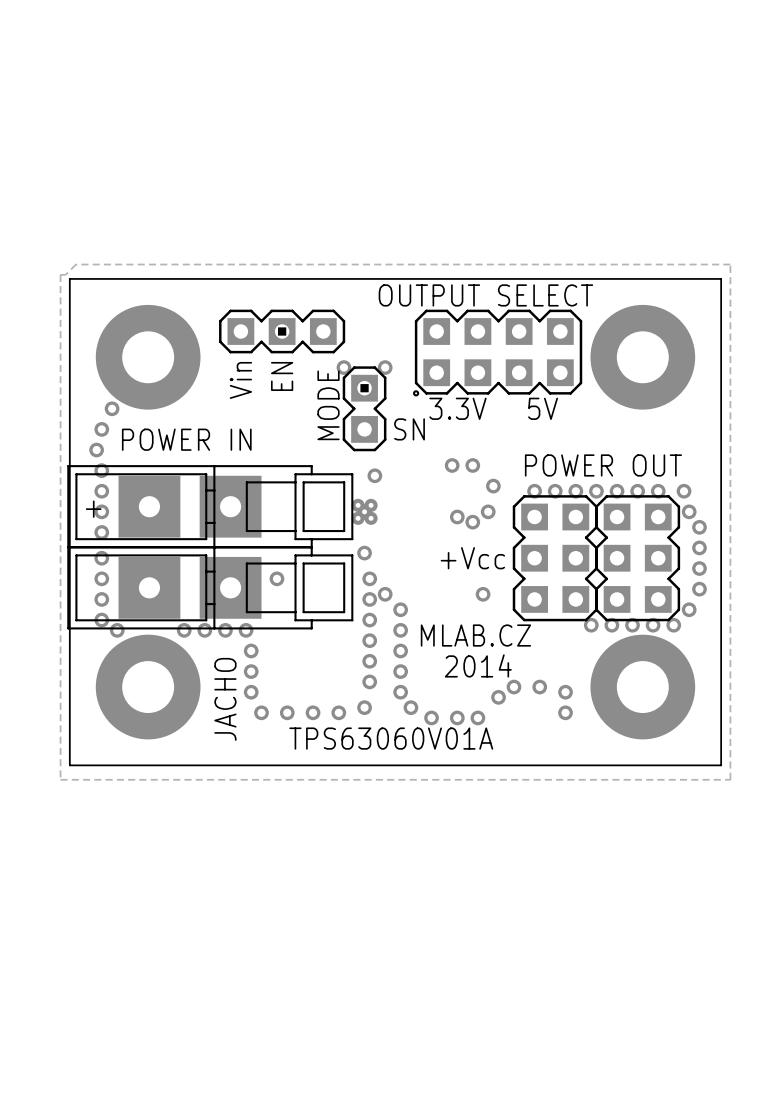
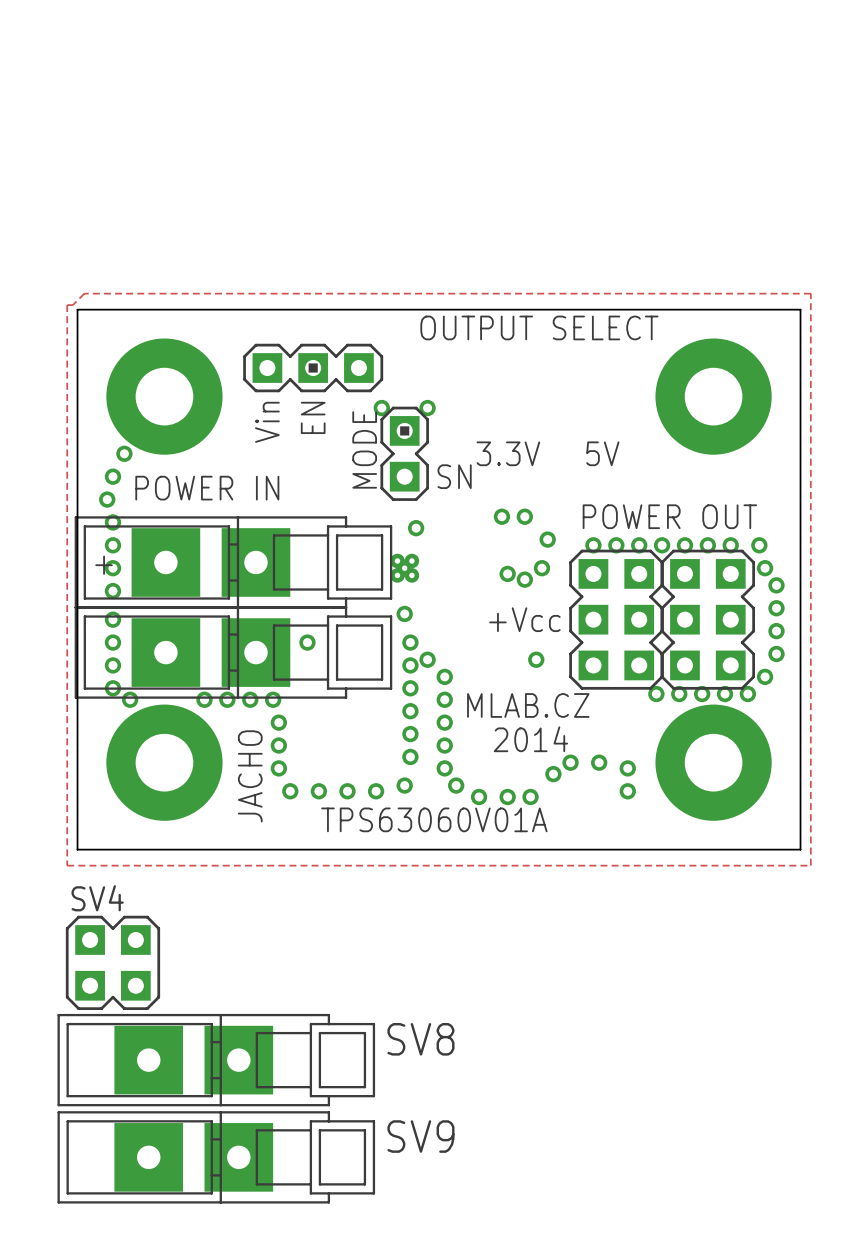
part: (497, 353) -> none
SV4: none -> (112, 962)
SV8: none -> (216, 1060)
SV9: none -> (216, 1157)

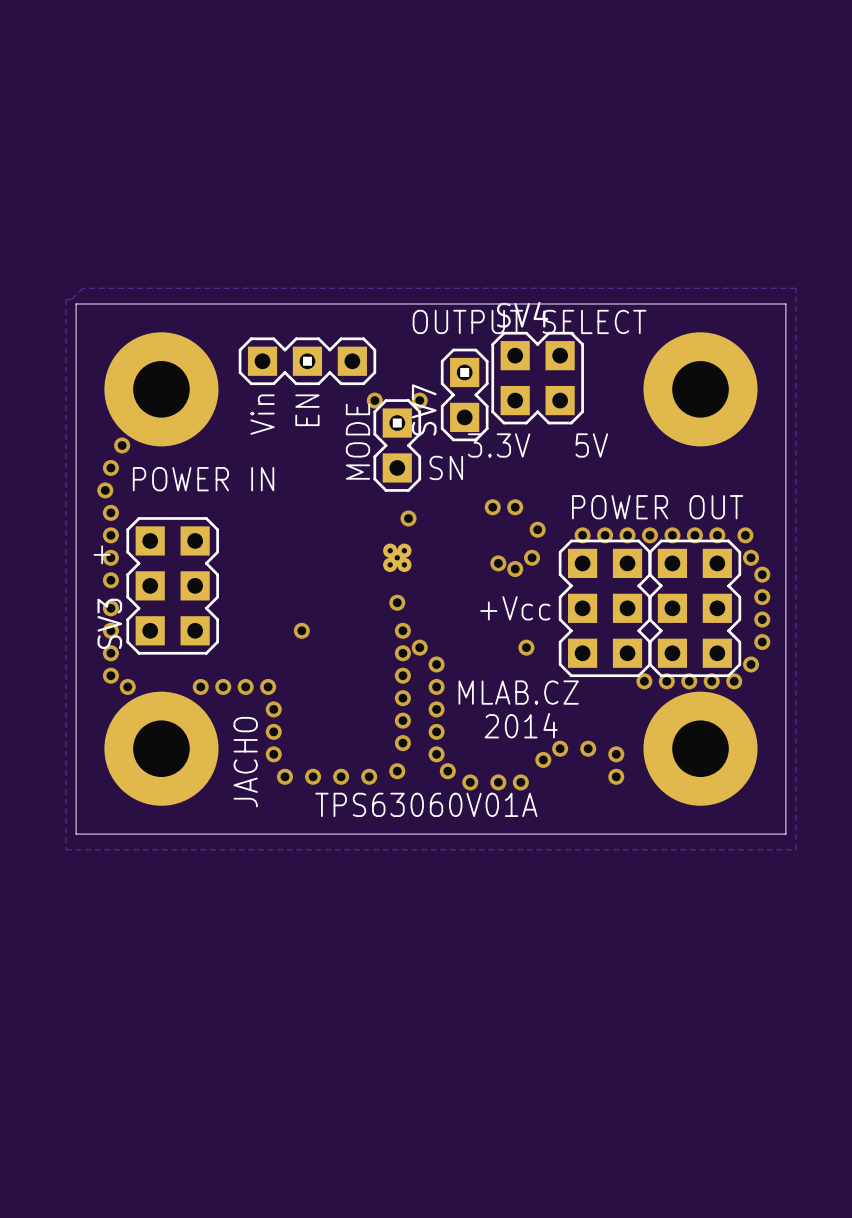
SV7: none -> (464, 394)
part: (233, 562) -> none
SV3: none -> (172, 585)
part: (233, 652) -> none
SV4 position: (112, 962) -> (537, 378)
SV8: (216, 1060) -> none
SV9: (216, 1157) -> none

